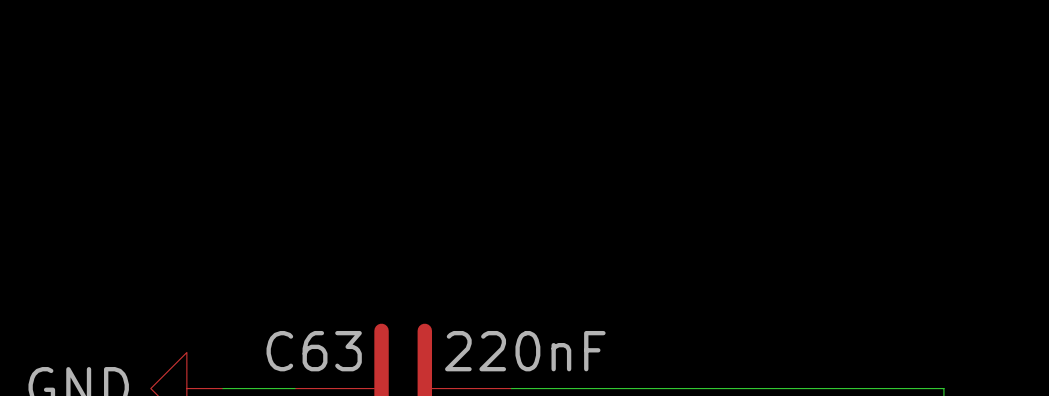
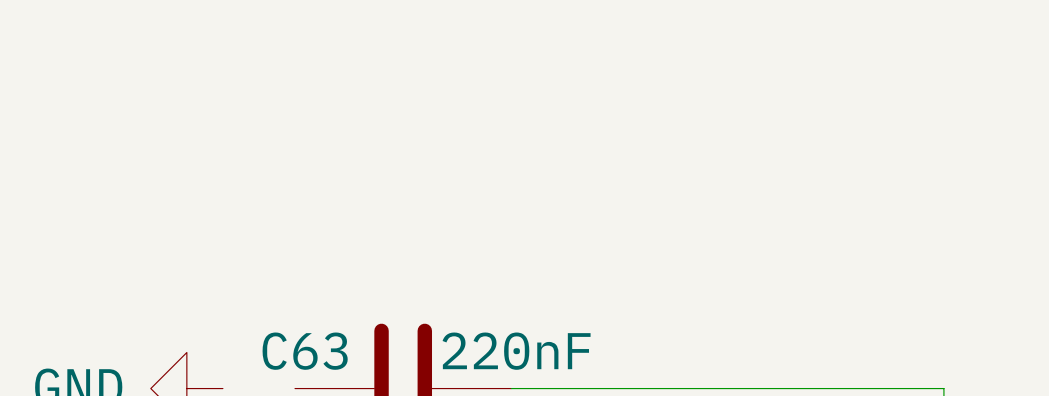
wire: (222, 388) (295, 388) -> none

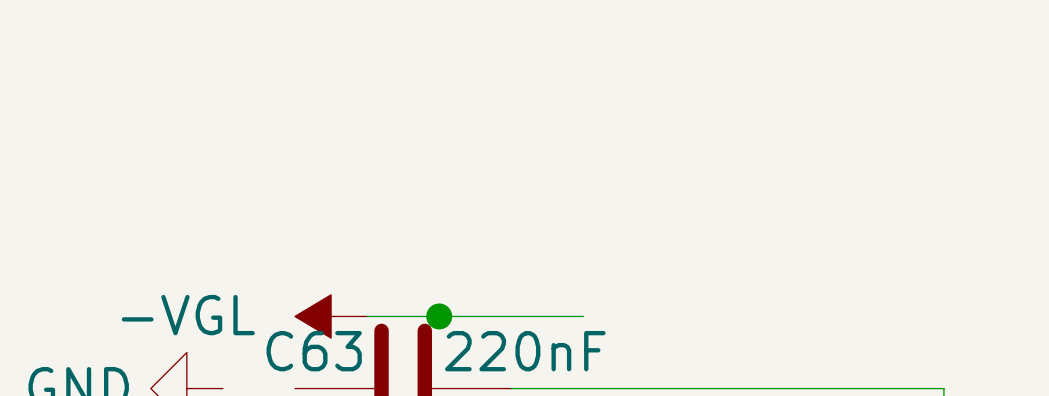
power symbol: none -> -VGL (331, 316)
wire: none -> (367, 316) (583, 316)
junction: none -> (439, 316)

